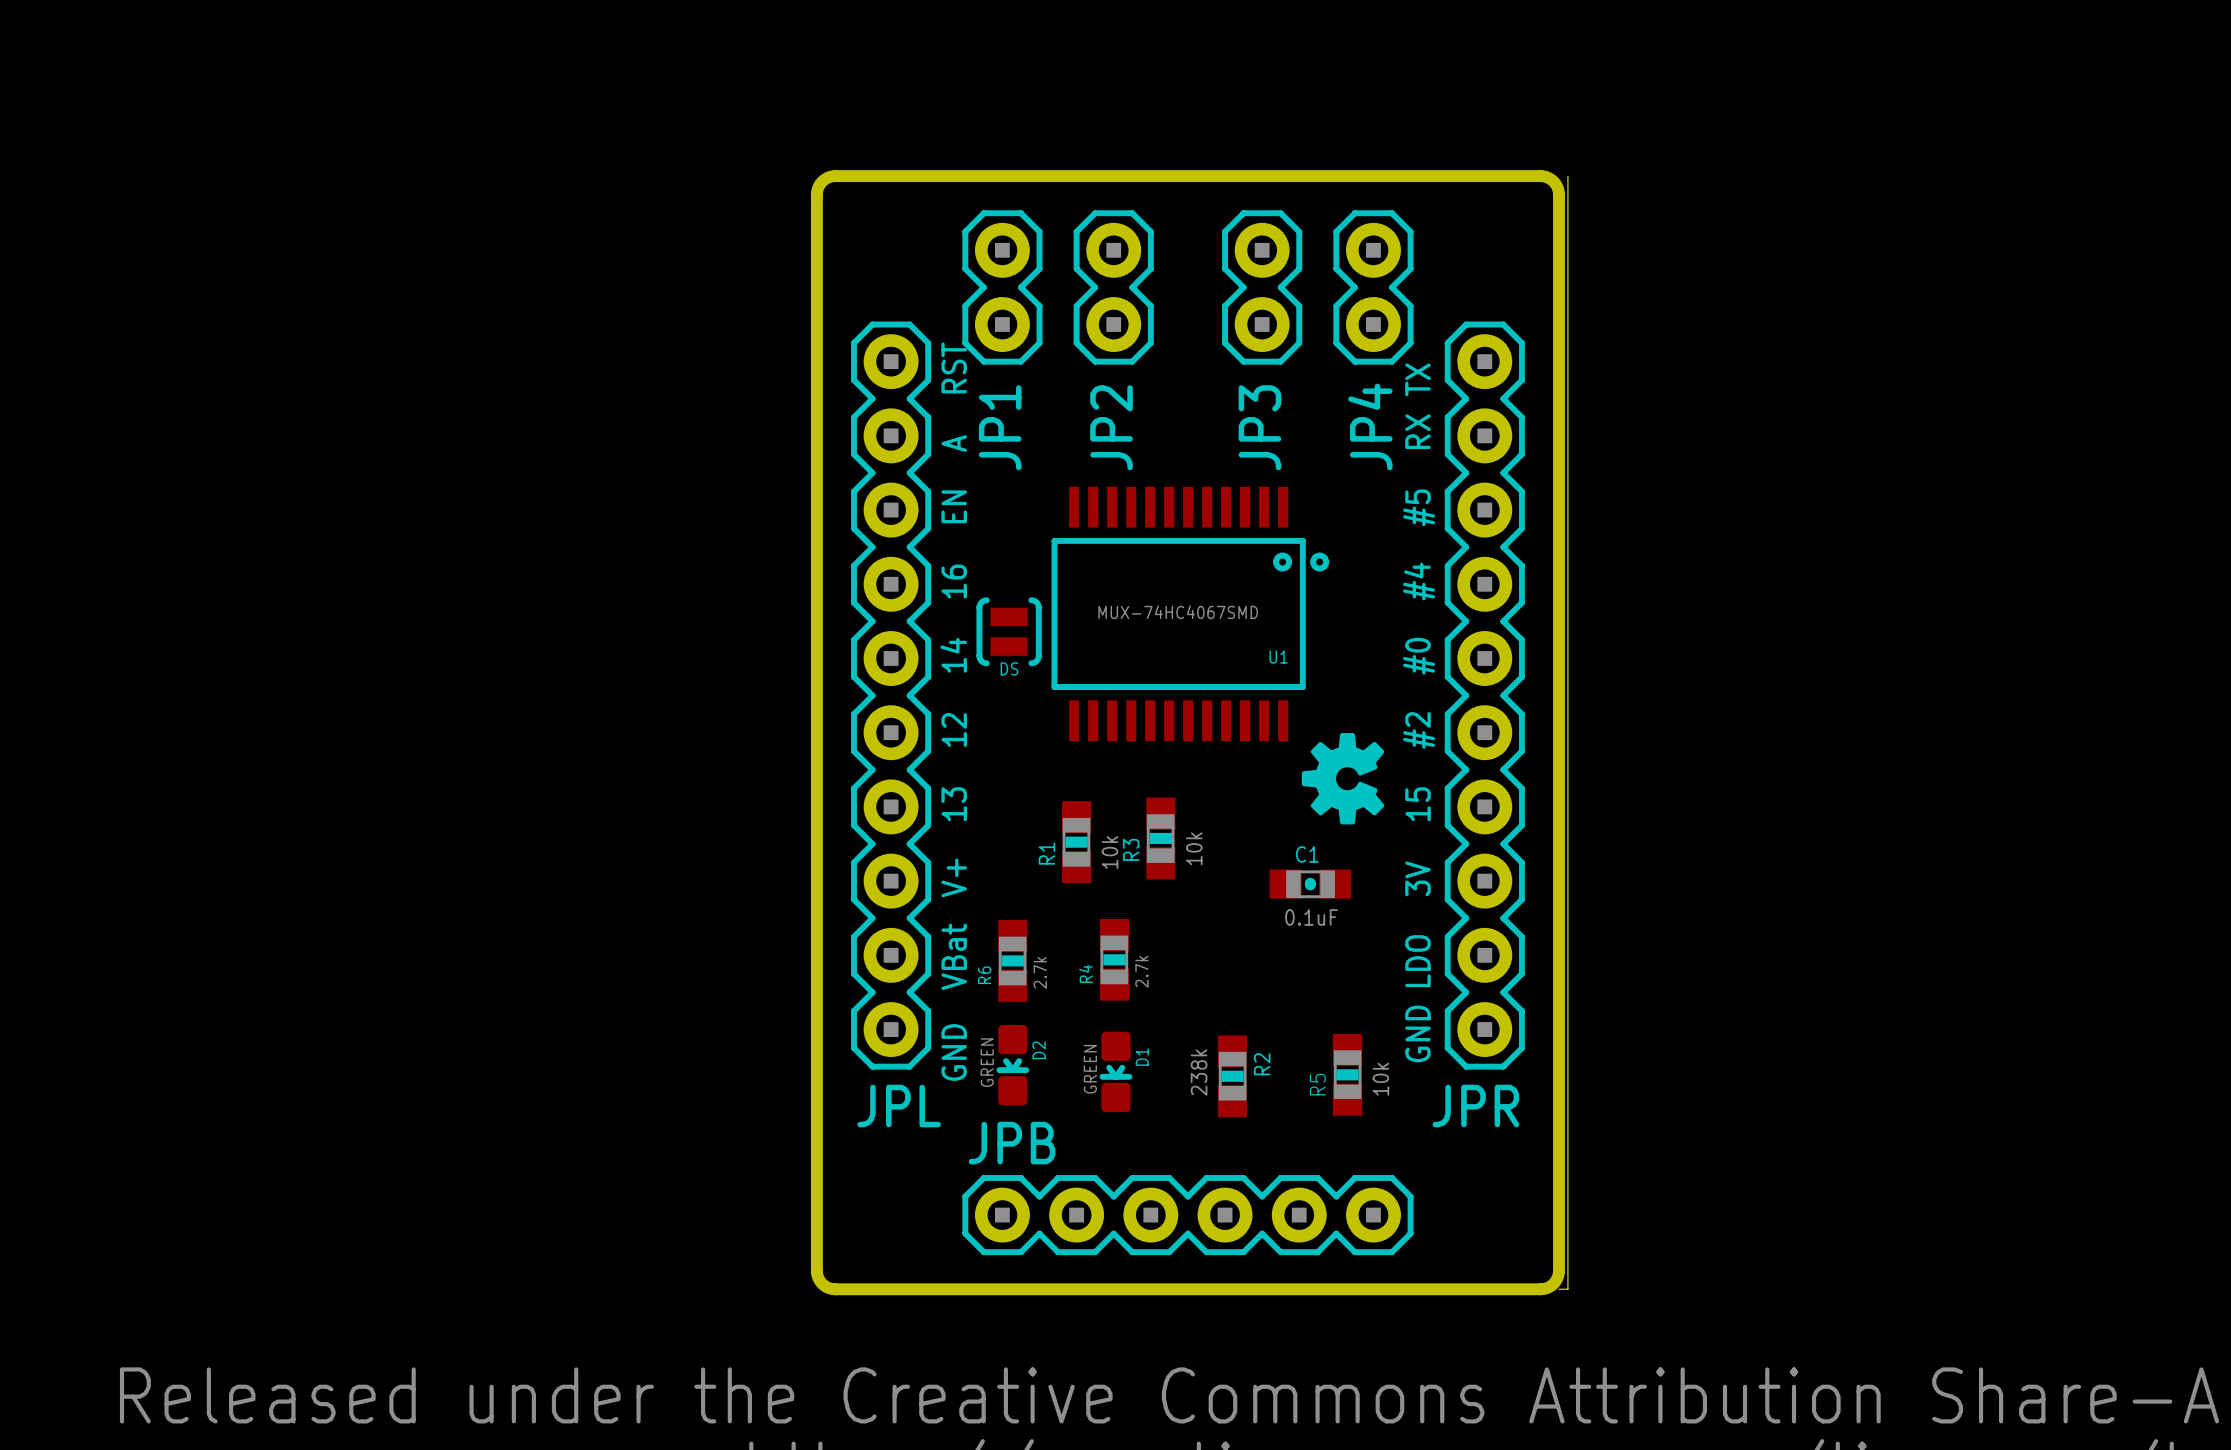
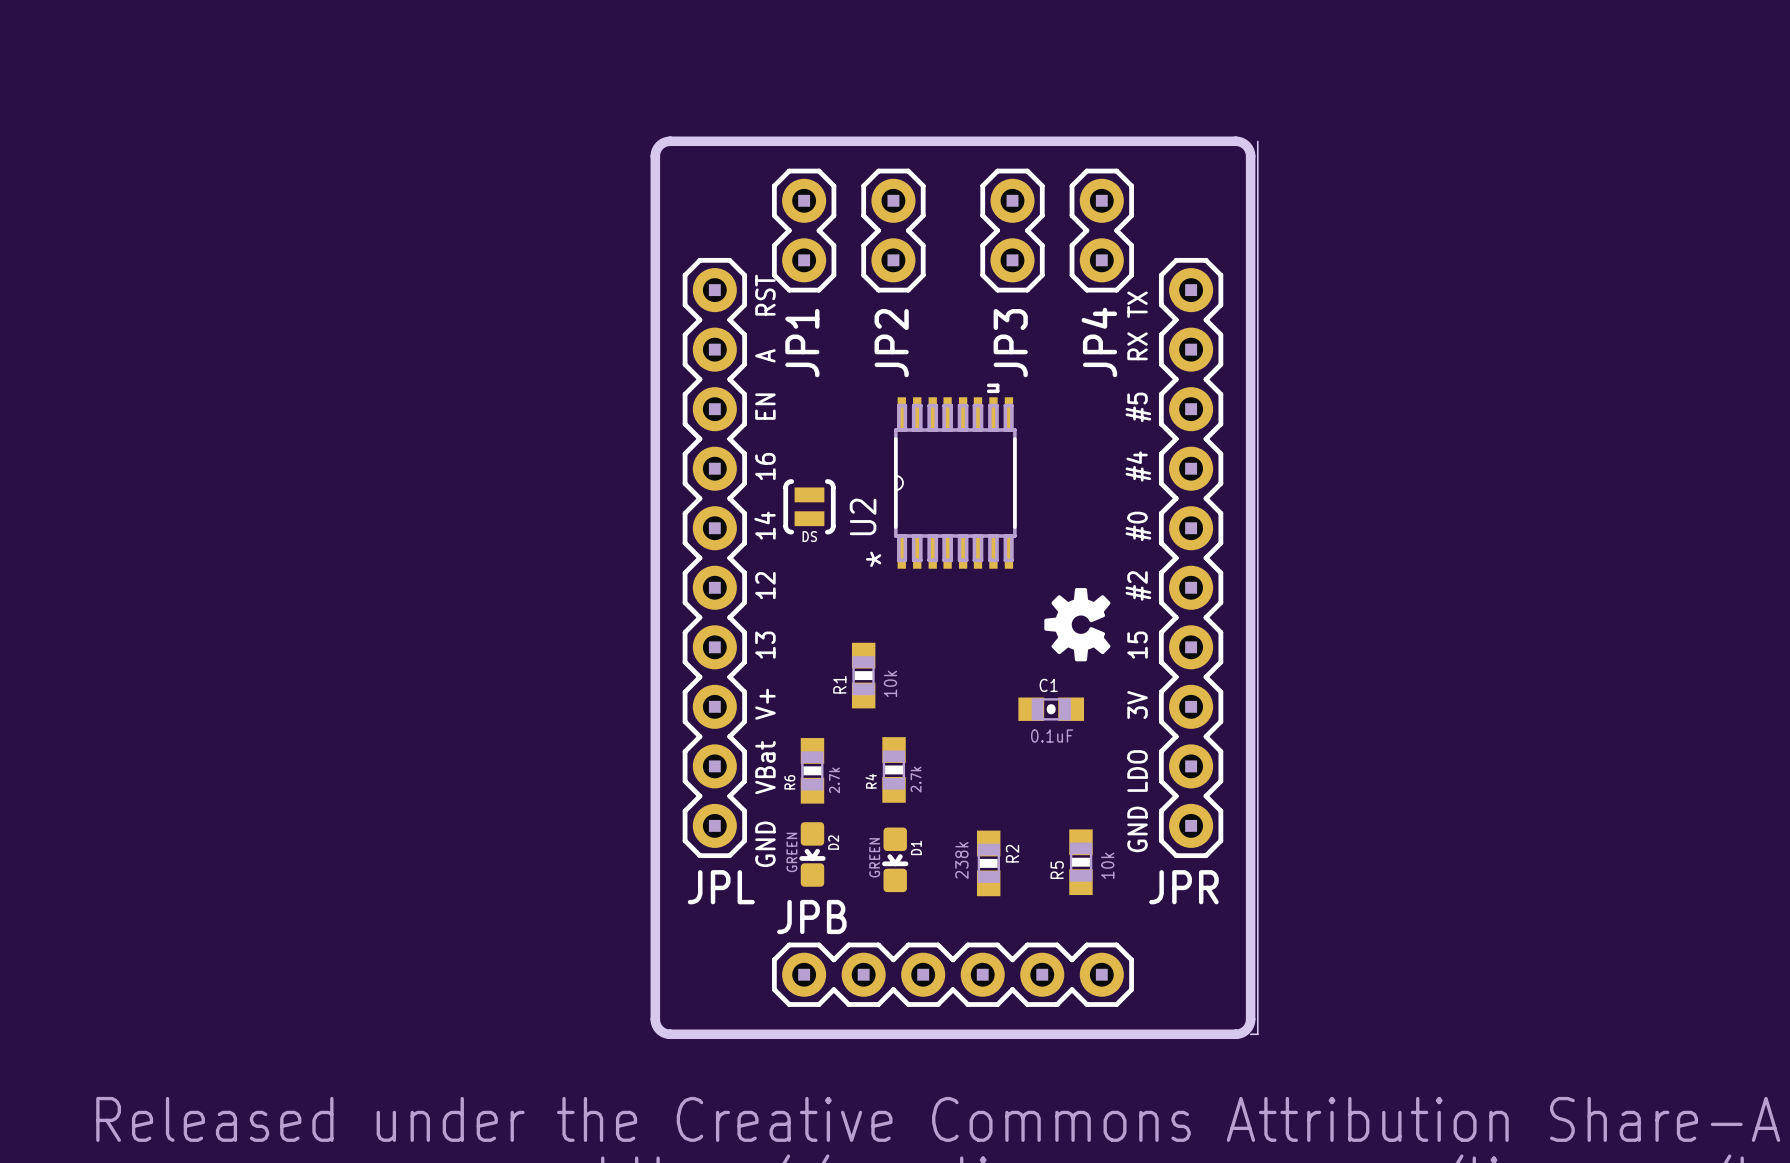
U2: none -> (955, 476)
U1: MUX-74HC4067SMD (1190, 613) -> none
R3: 10k (1160, 838) -> none

